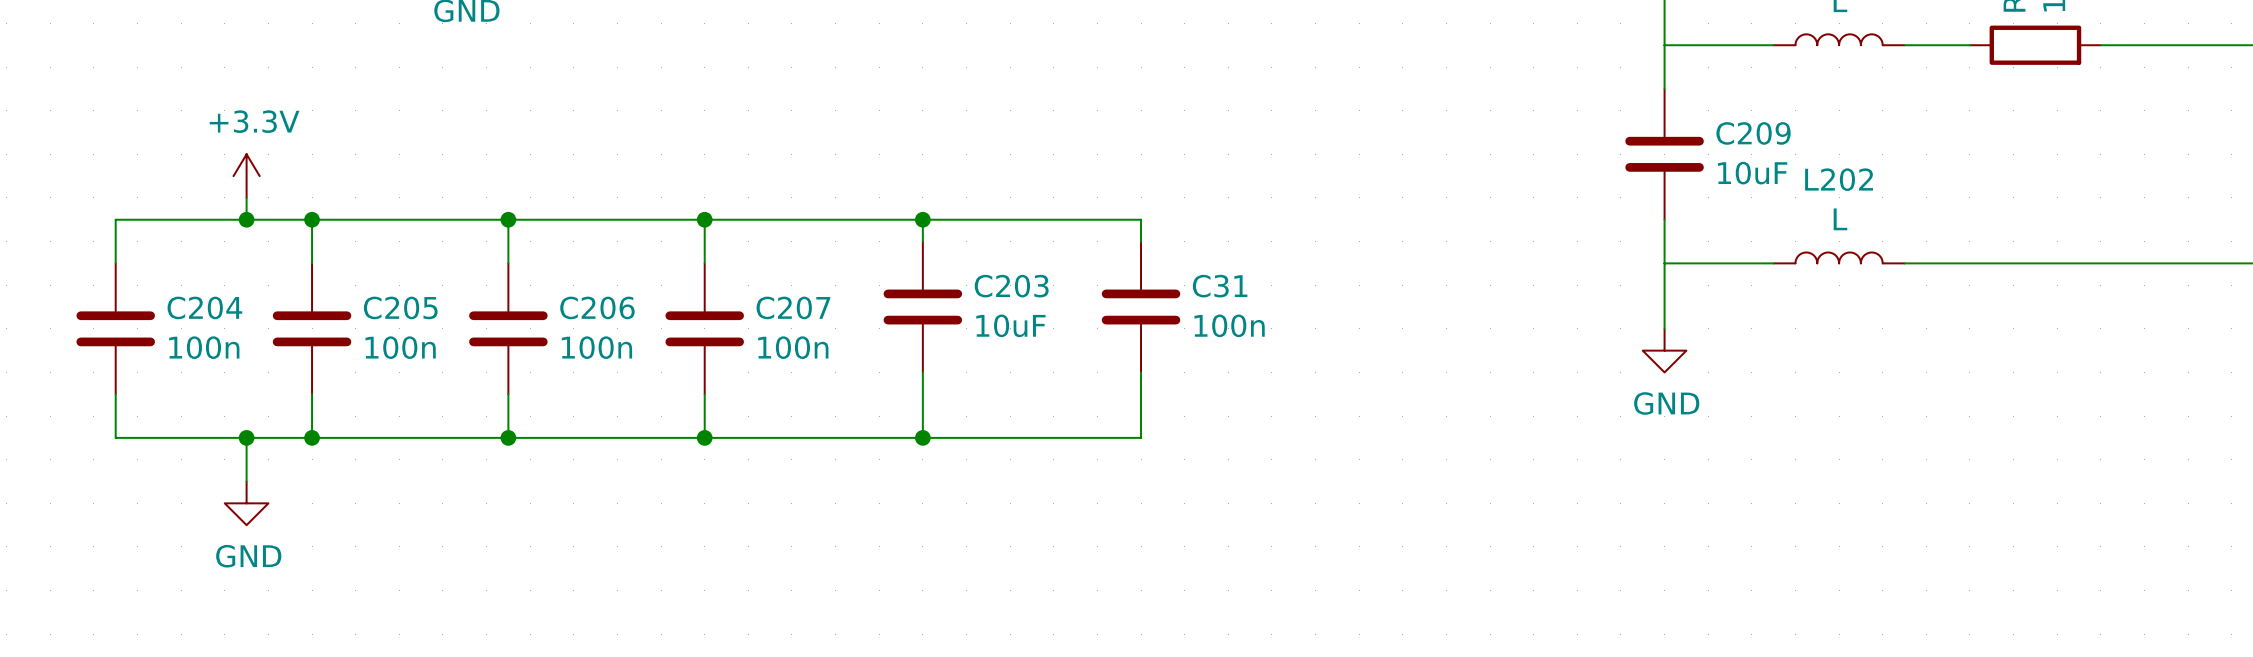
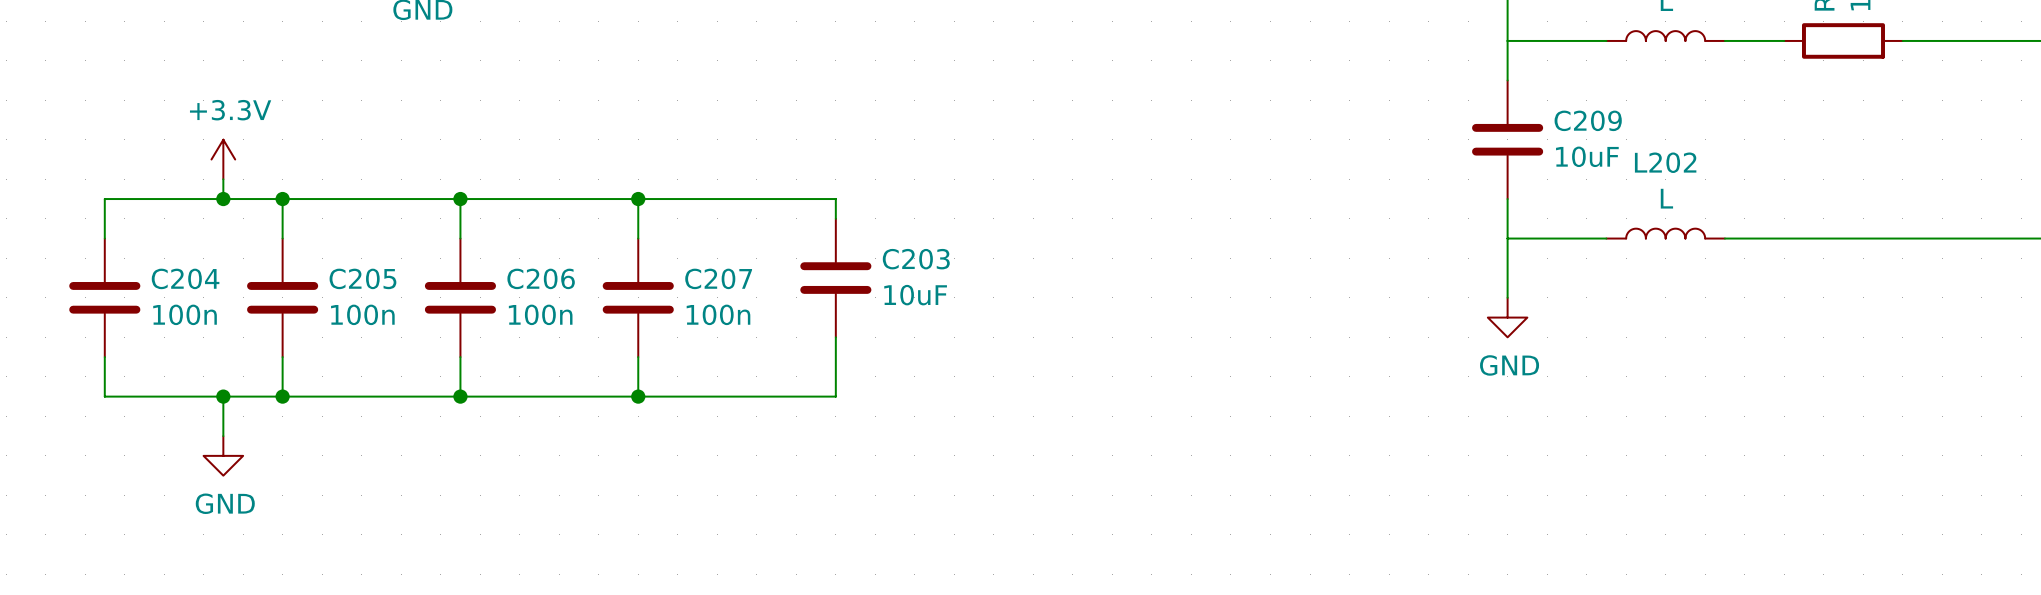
wire: (922, 219) (1141, 219) (1141, 241) -> none
junction: (922, 219) -> none
C31: 100n (1141, 307) -> none
wire: (1141, 372) (1141, 437) (922, 437) -> none
junction: (922, 437) -> none

